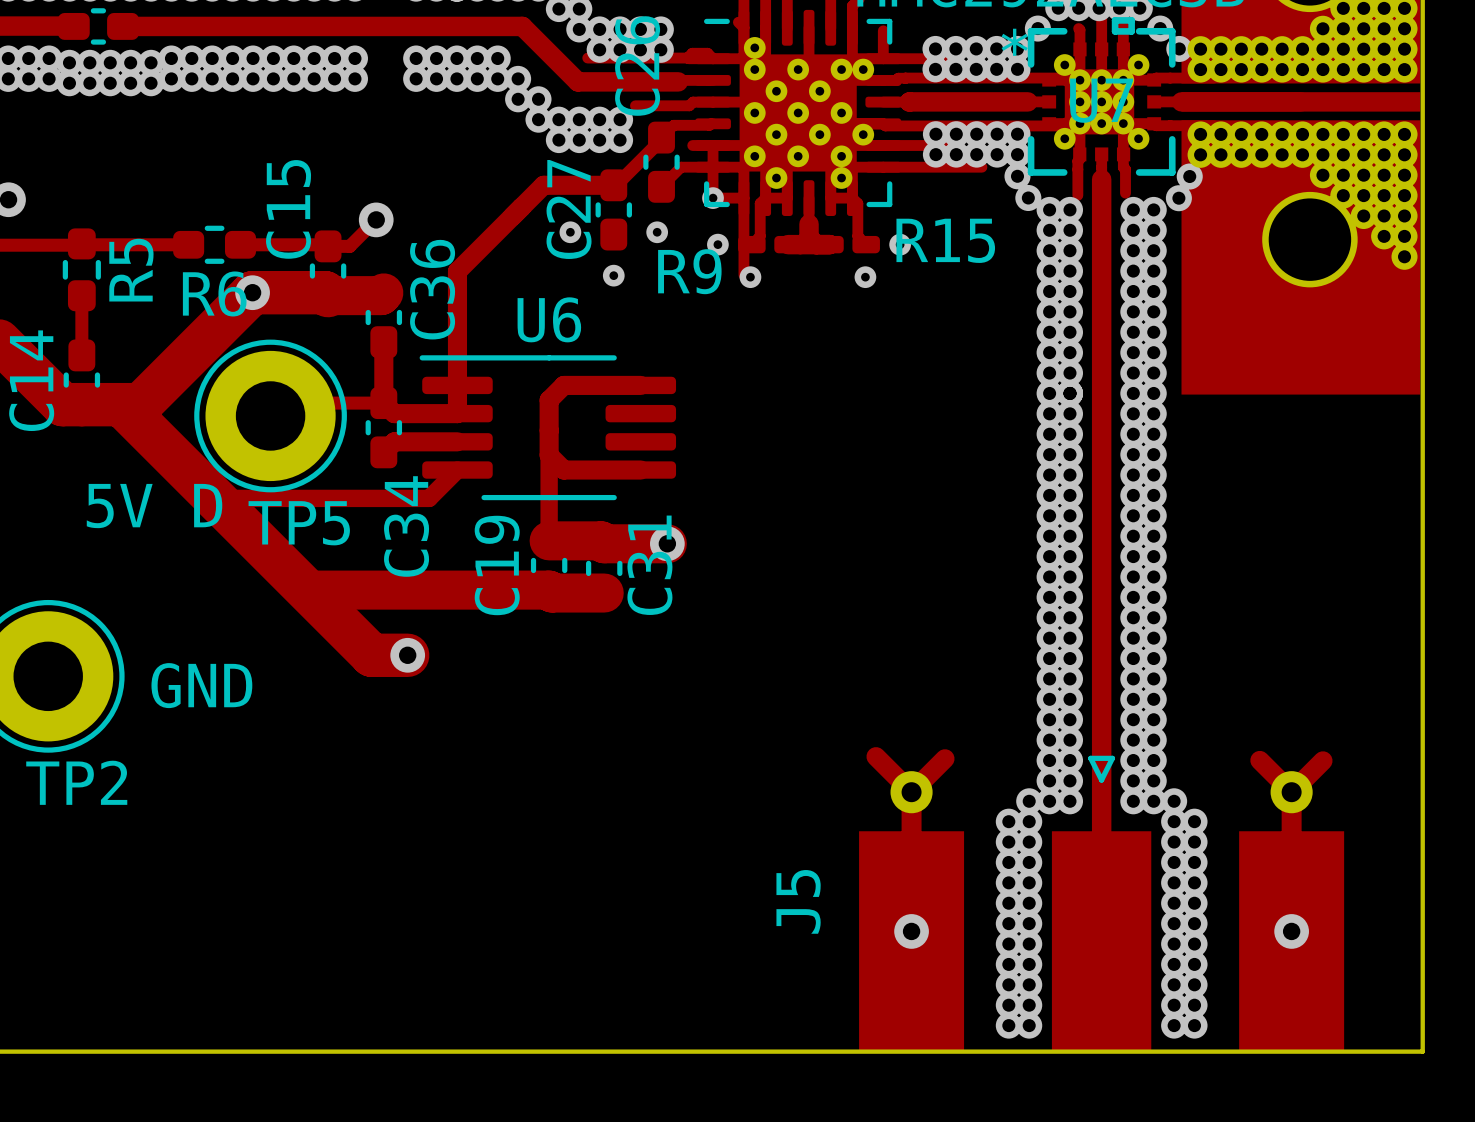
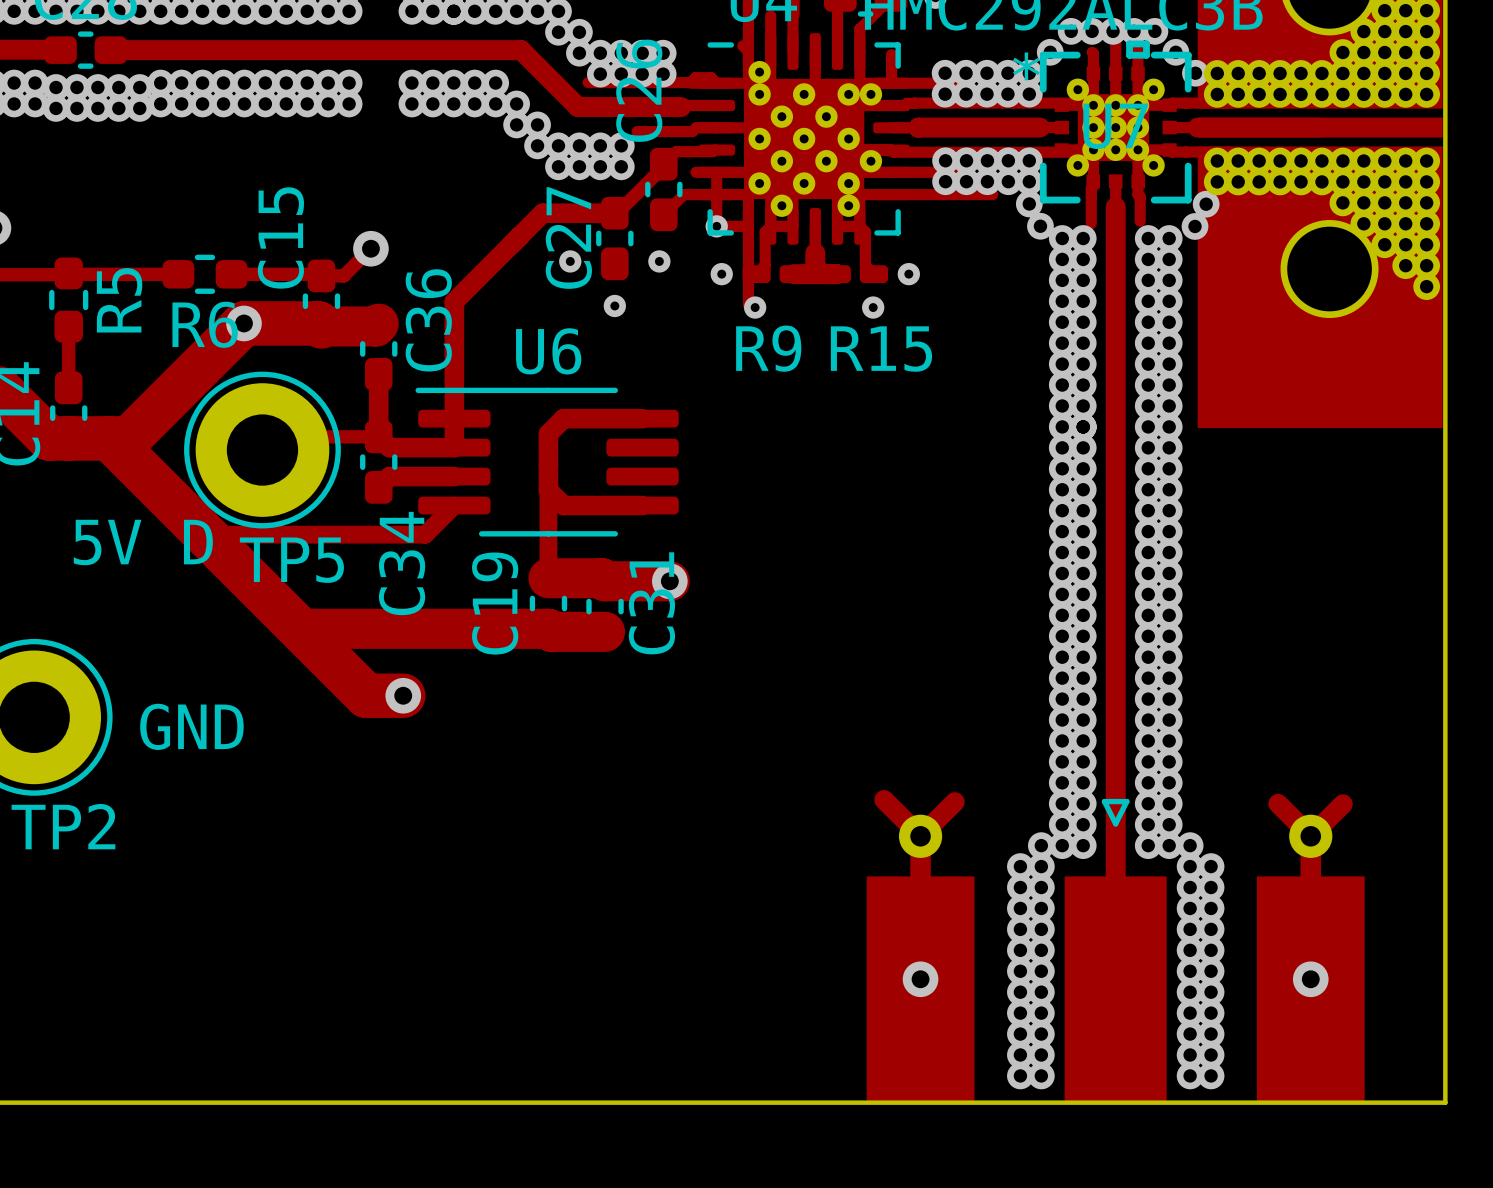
R15 name position: R15 (945, 240) -> R15 (881, 349)
R9 name position: R9 (689, 271) -> R9 (768, 348)
J5 name: J5 (798, 901) -> none

